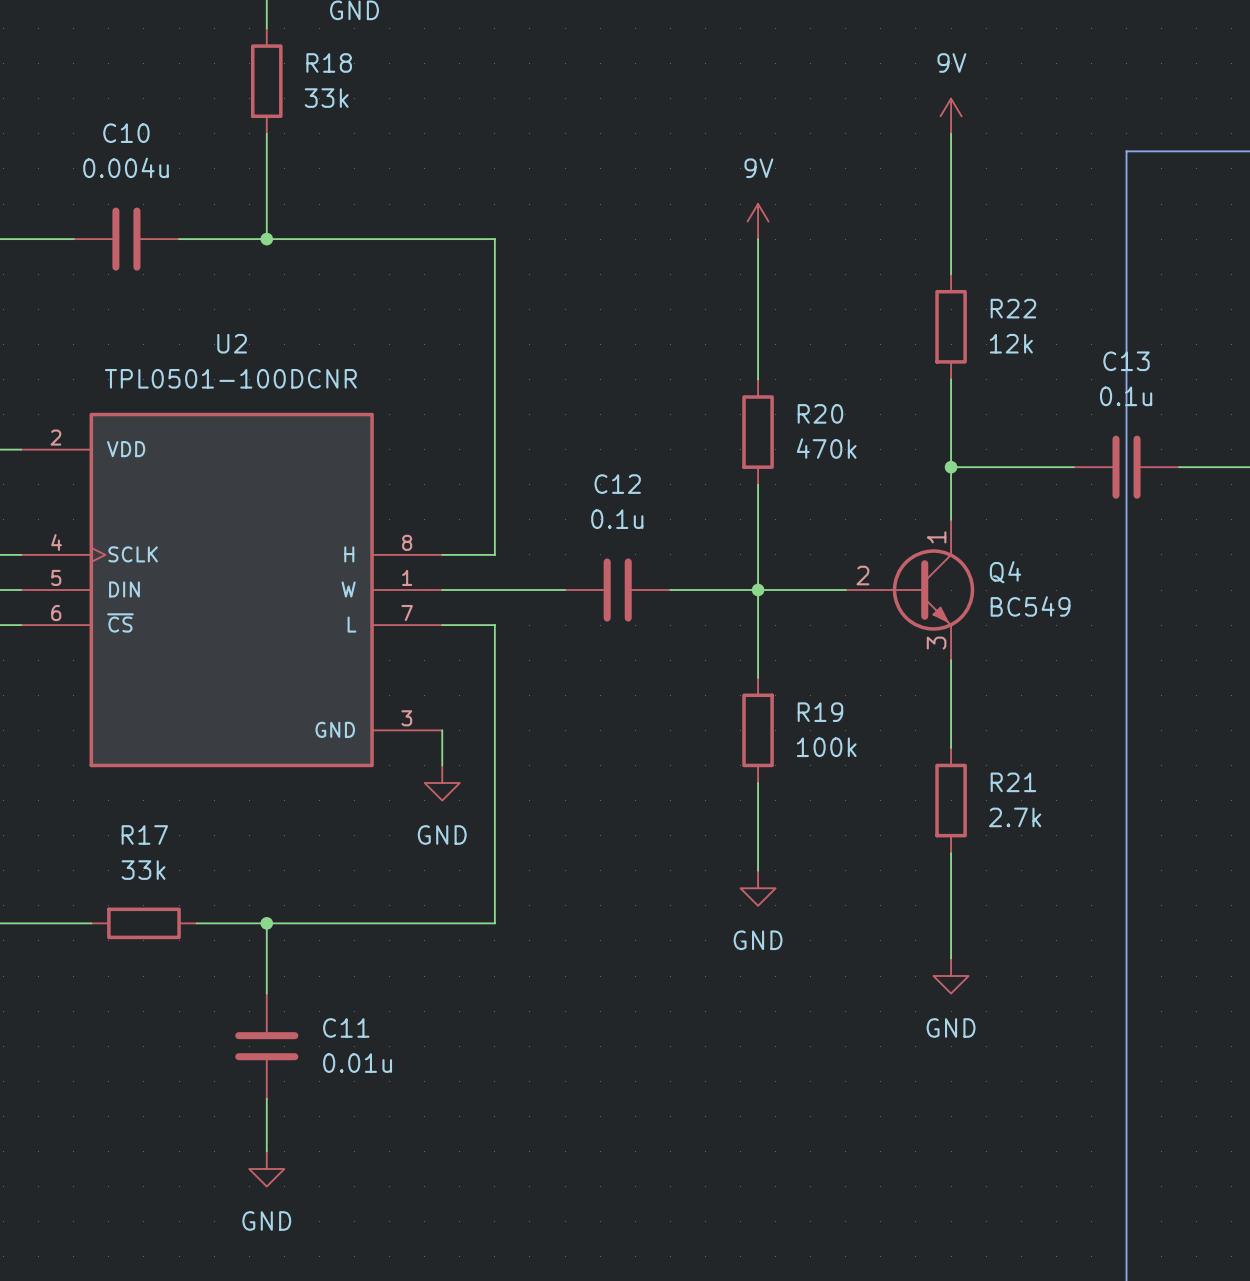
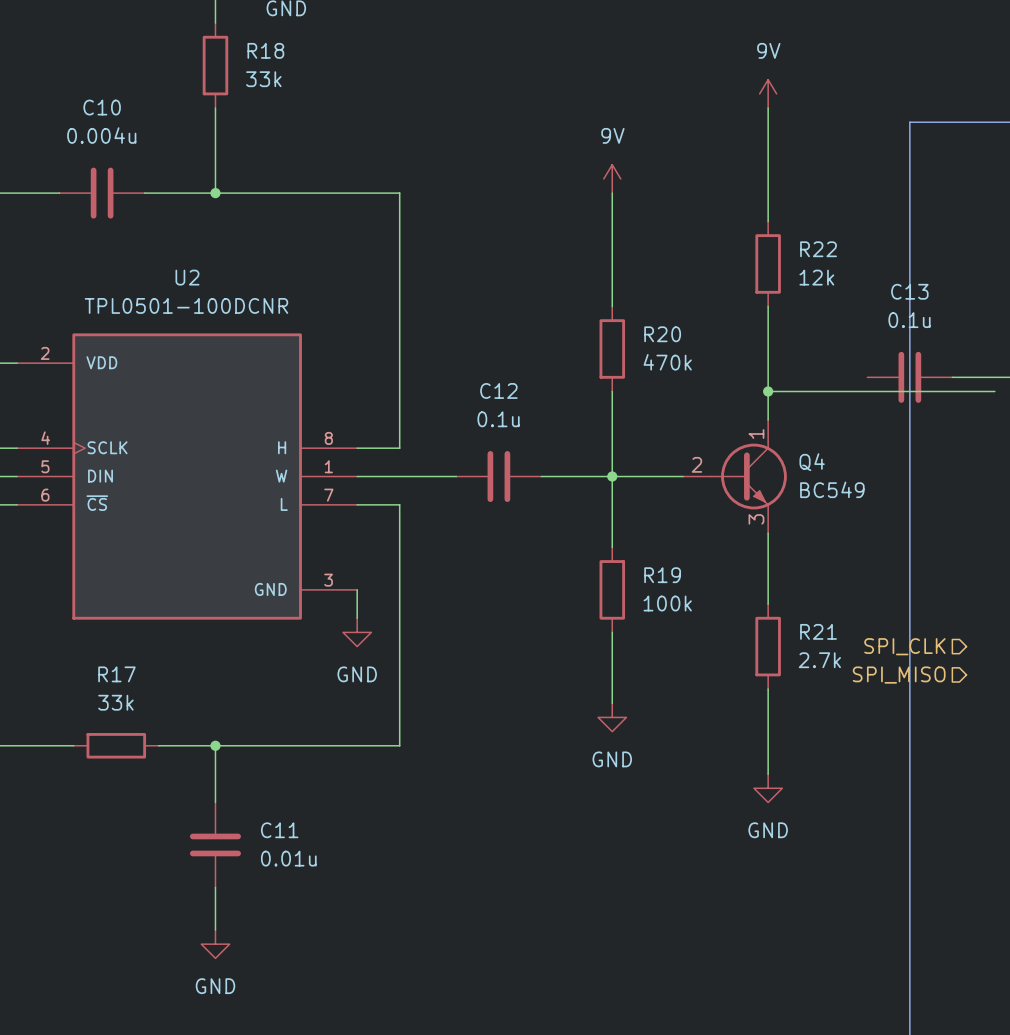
wire: (951, 467) (1073, 467) -> none
junction position: (951, 467) -> (768, 391)
wire: none -> (768, 391) (994, 391)
hierarchical label: none -> SPI_CLK (904, 646)
hierarchical label: none -> SPI_MISO (899, 675)

